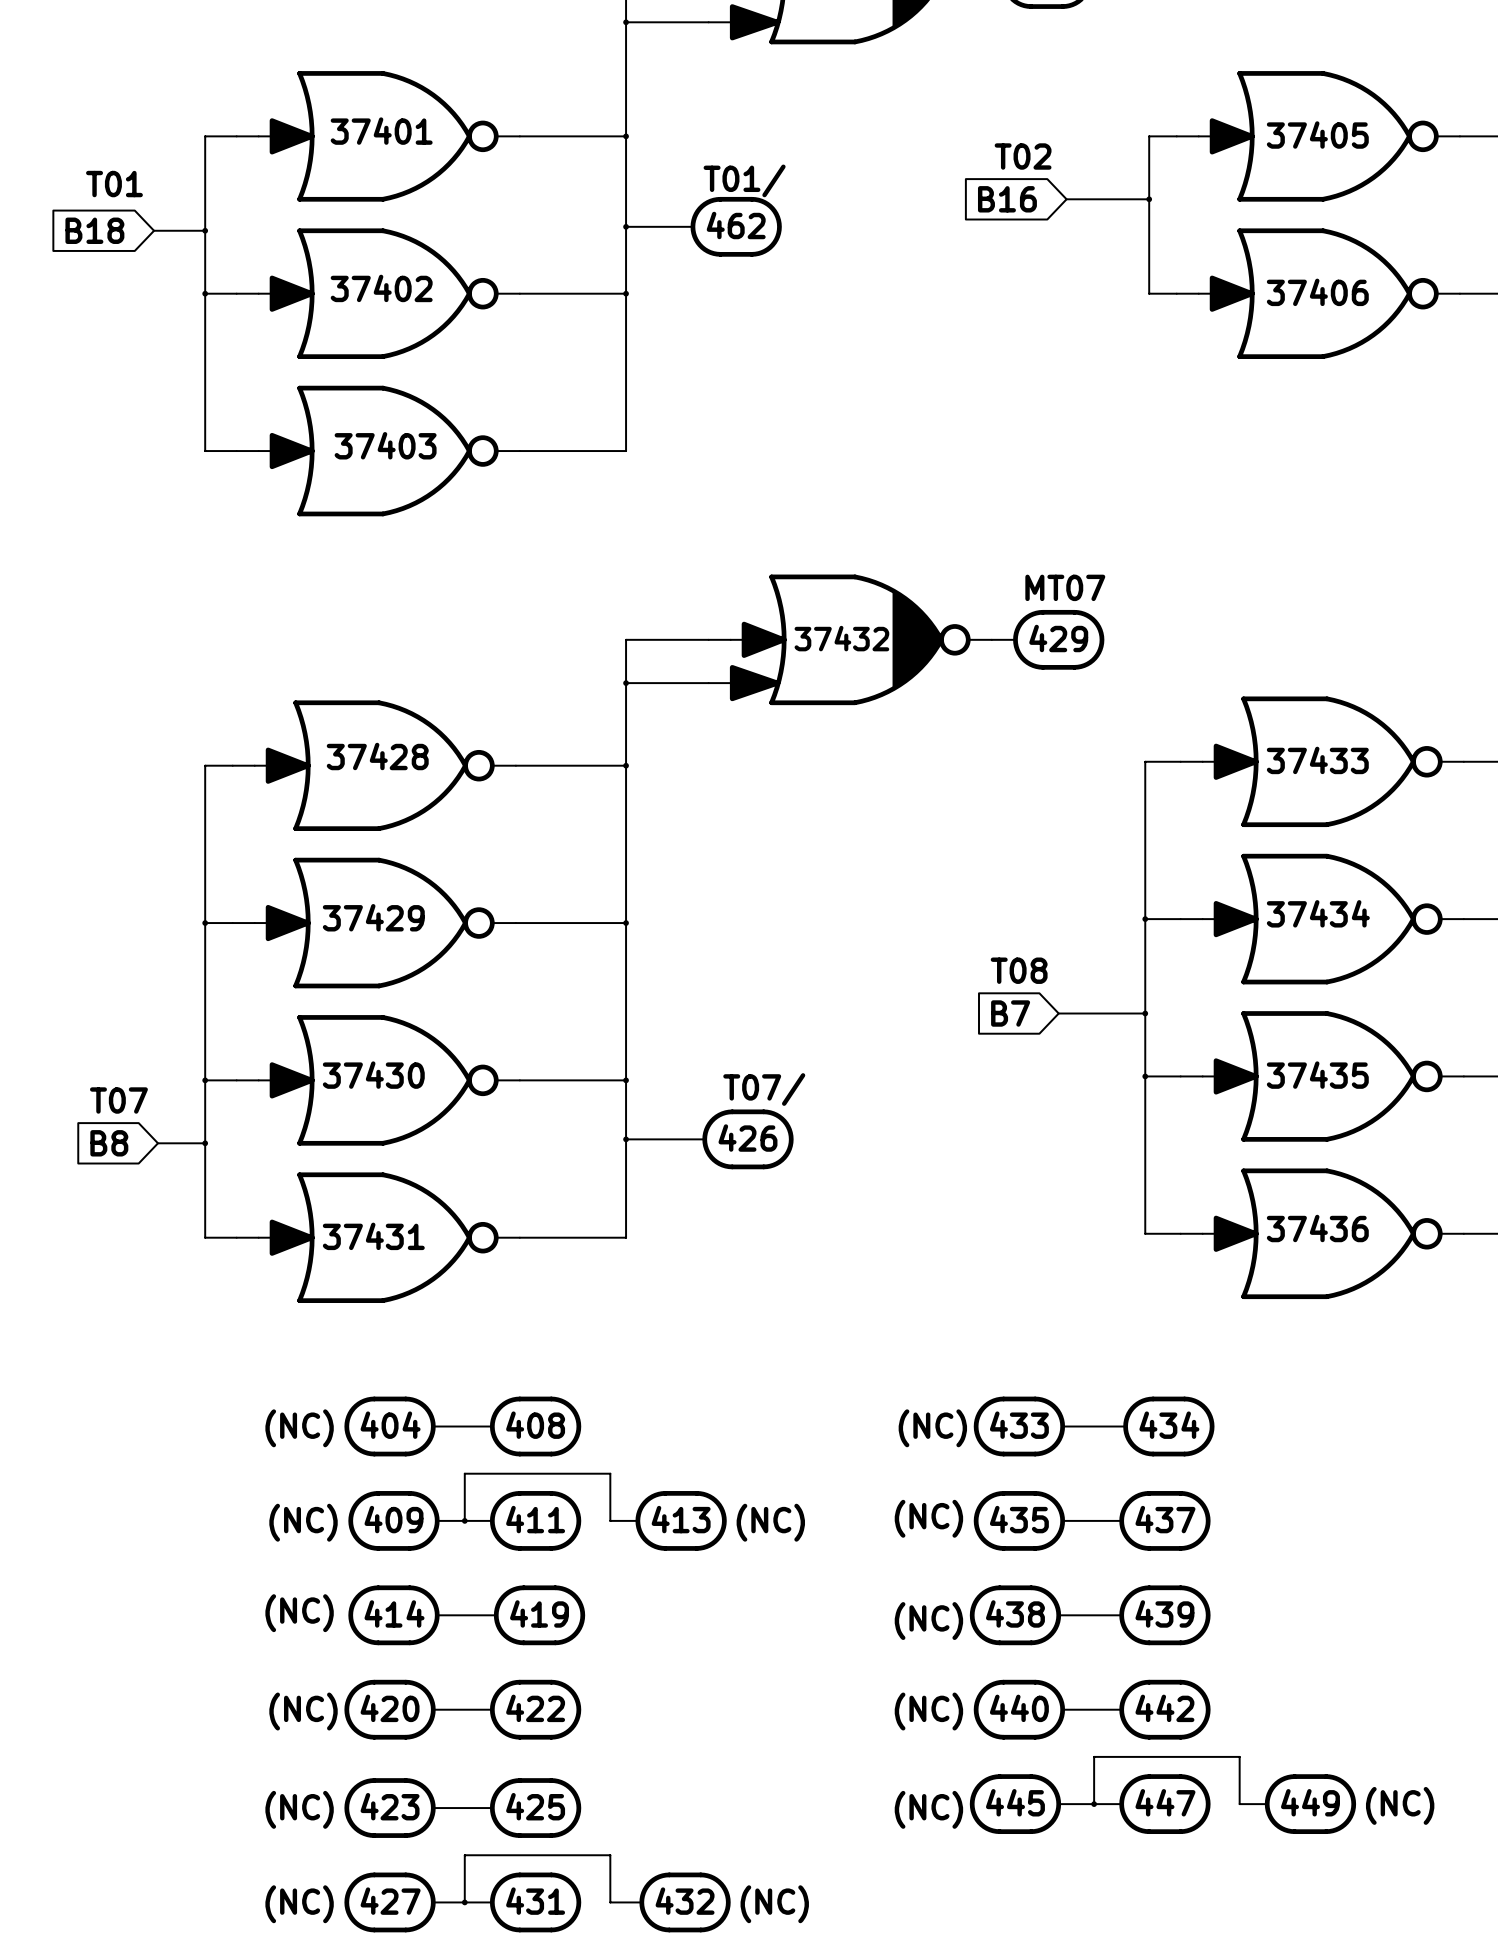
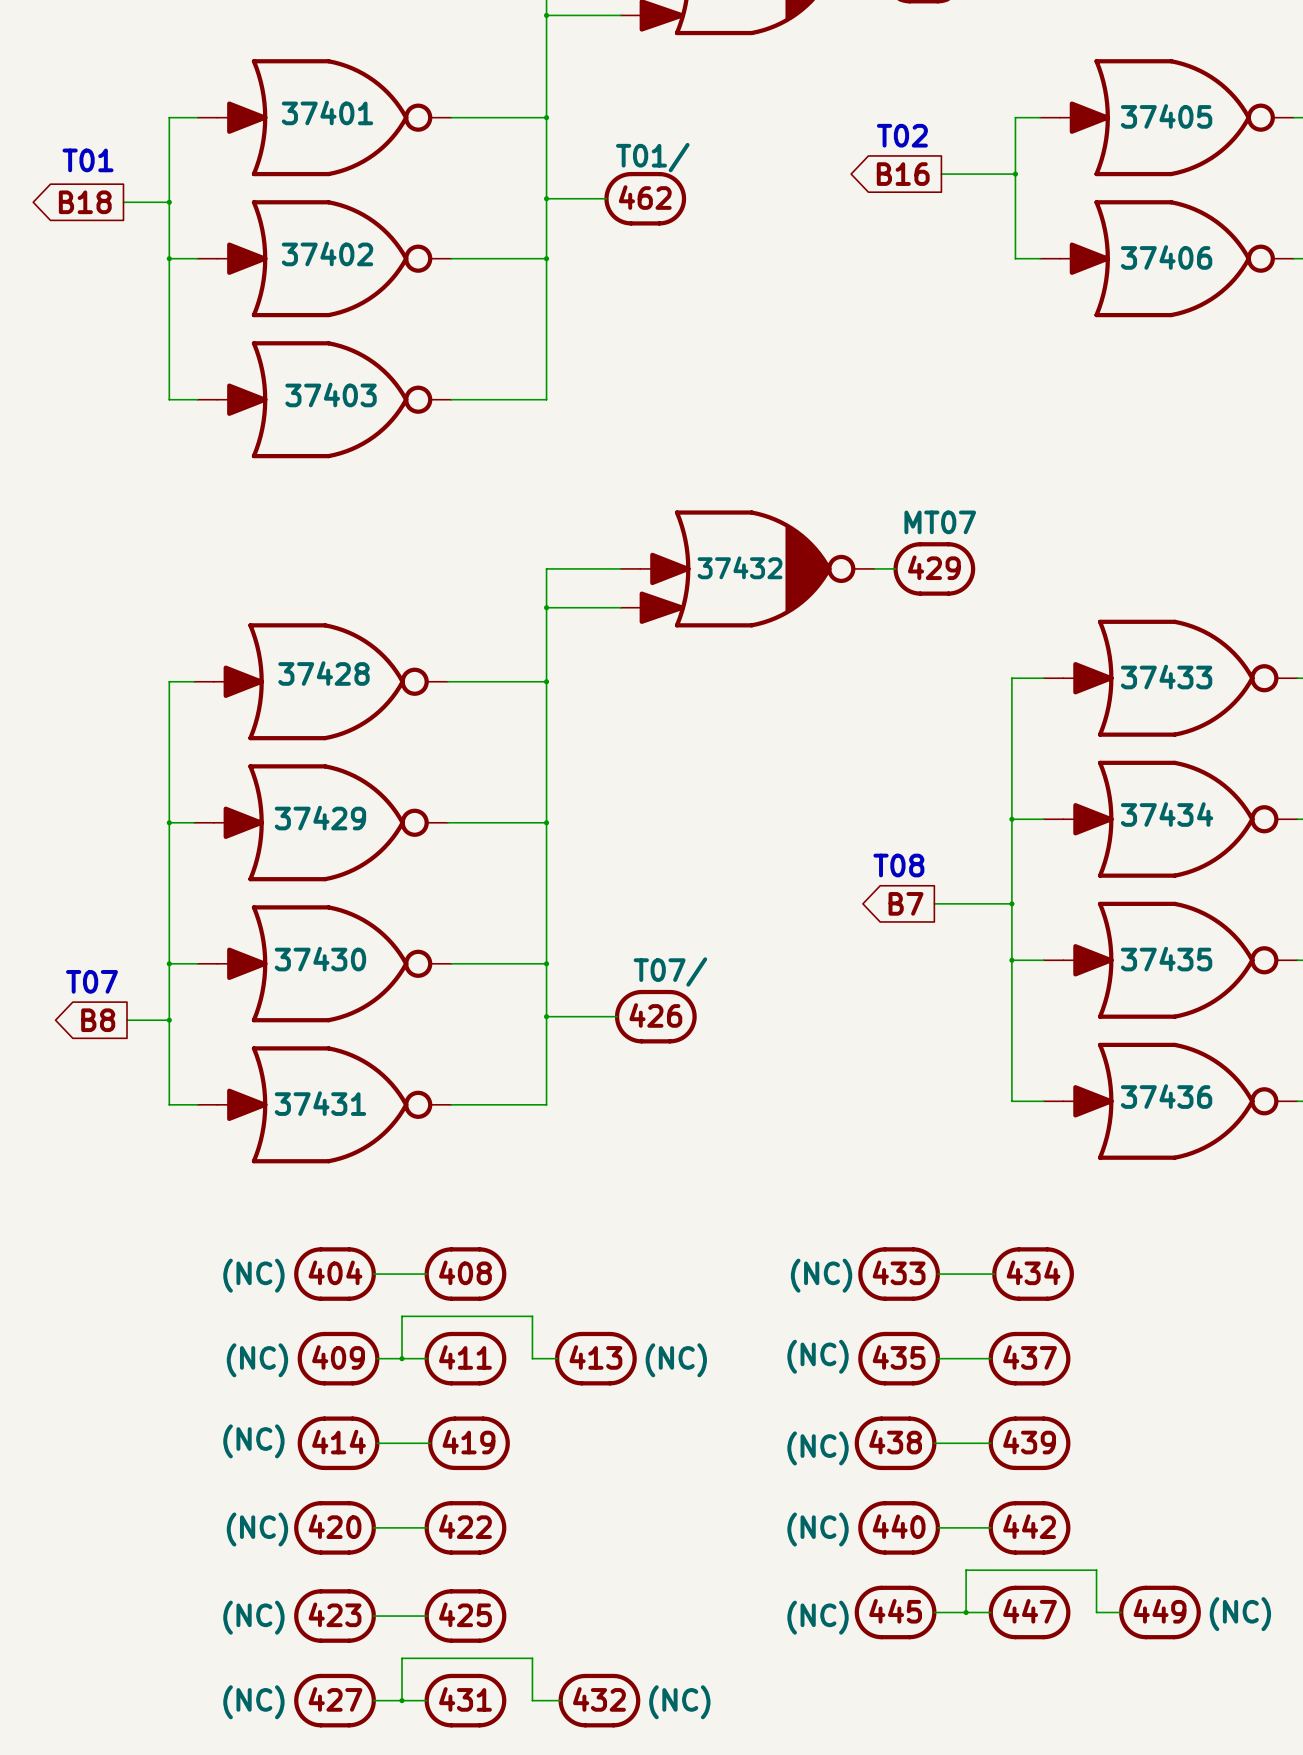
global label shape: input (1007, 199) -> output (903, 174)
global label shape: input (94, 230) -> output (85, 202)
global label shape: input (1010, 1013) -> output (906, 903)
global label shape: input (109, 1143) -> output (98, 1020)

